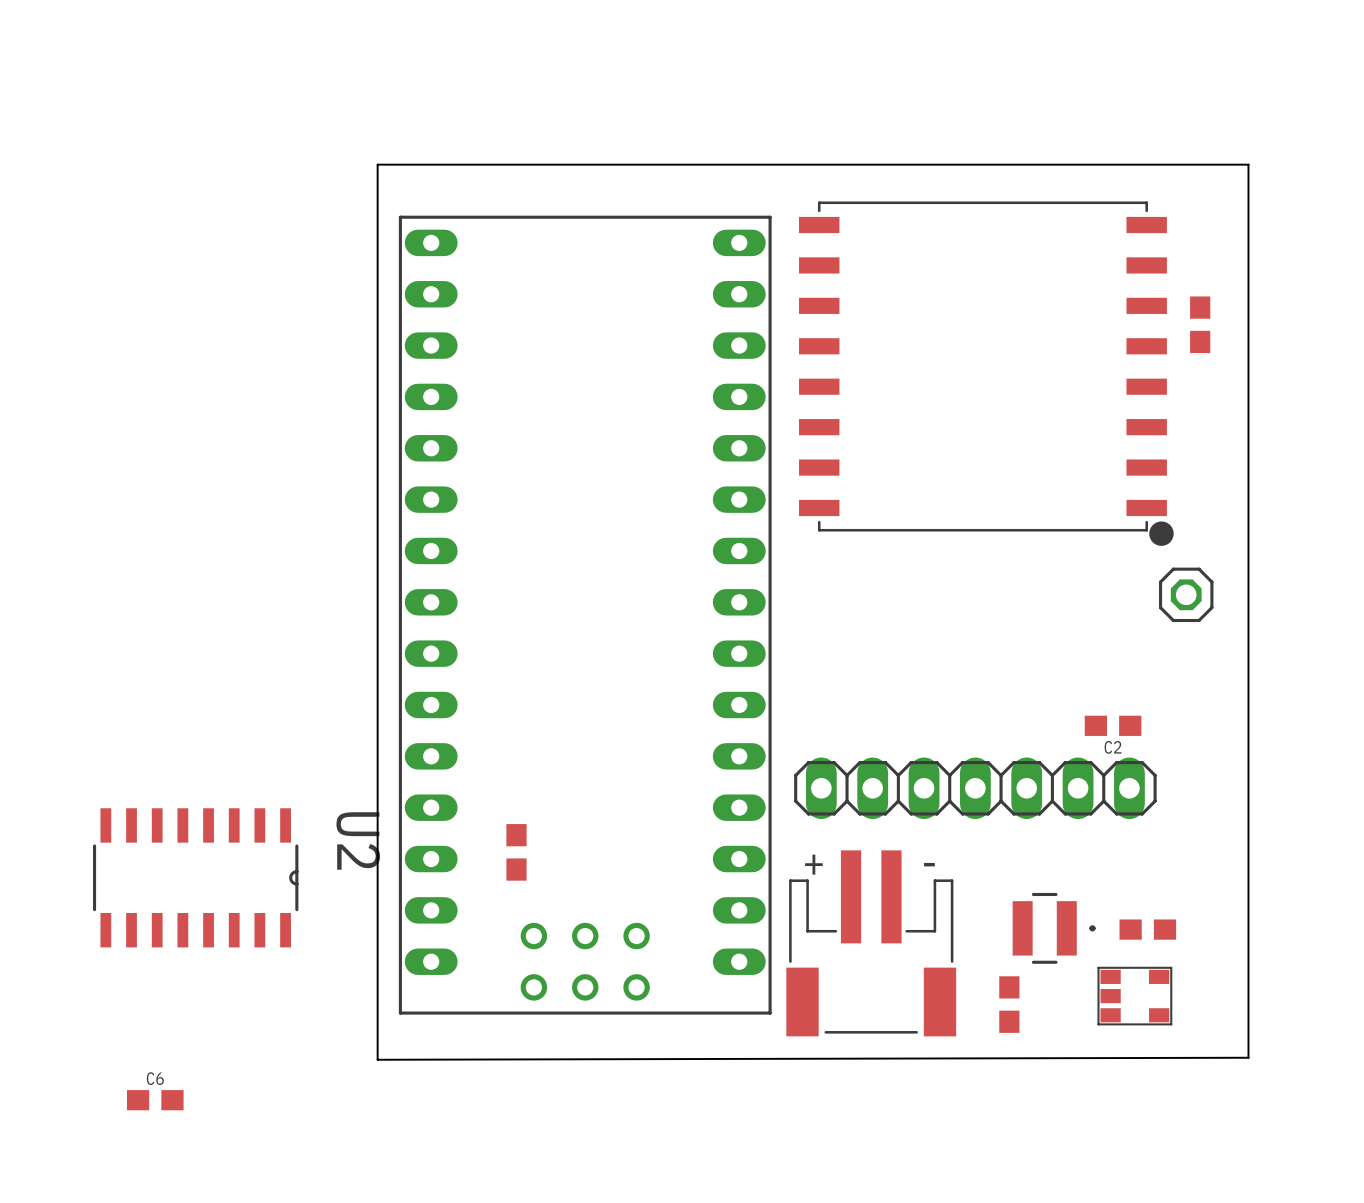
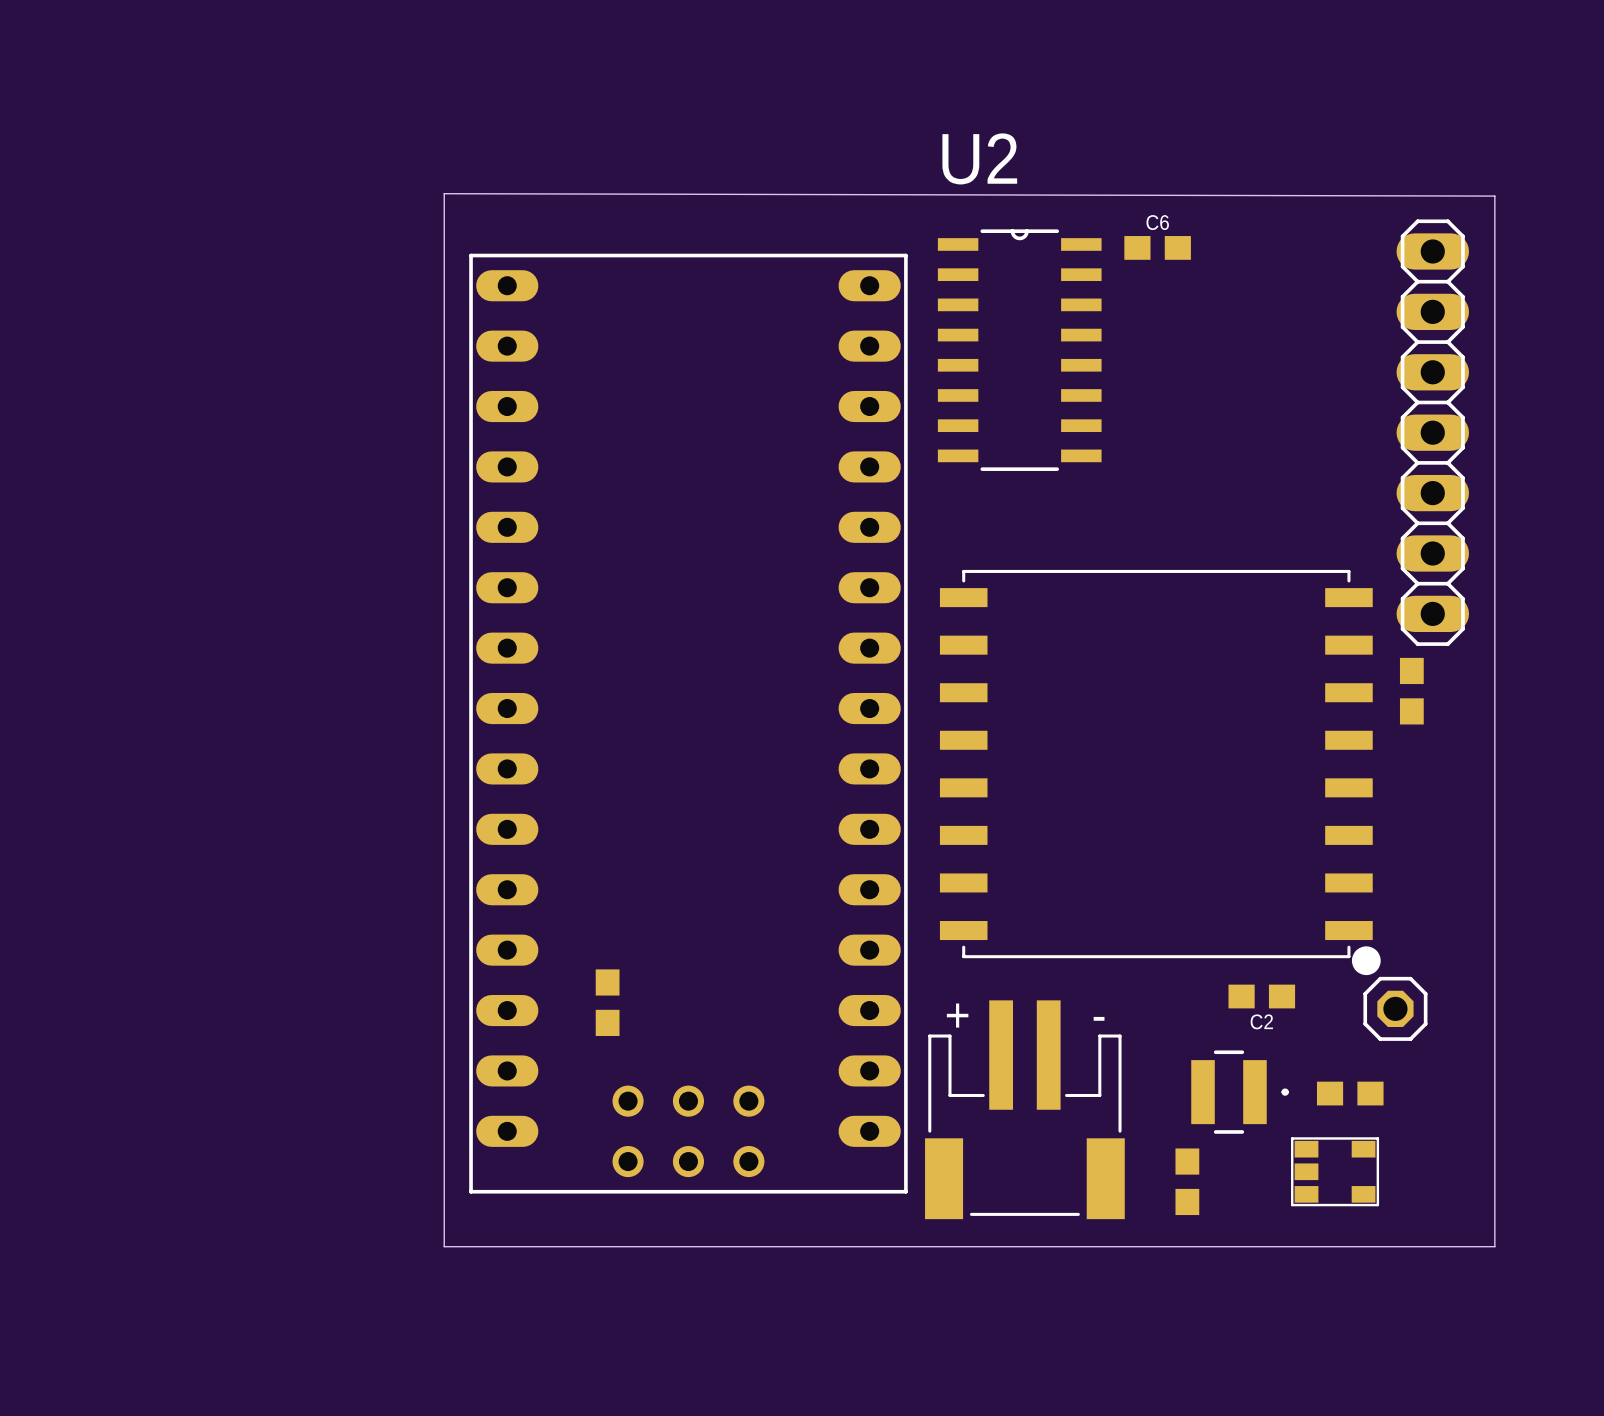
board edge: (377, 164) (1248, 164) (1248, 1057) (377, 1059) -> (444, 193) (1494, 196) (1494, 1246) (444, 1246)
part: (1200, 324) -> none
part position: (986, 373) -> (1160, 772)
part footprint: [1159, 567, 1214, 623] -> [1399, 657, 1424, 725]
C2 position: (1113, 725) -> (1261, 996)
part rotation: 0° (975, 788) -> 90° clockwise (1432, 432)
part position: (975, 788) -> (1432, 432)
part: none -> (1395, 1008)
U2 rotation: 0° (195, 877) -> 90° counterclockwise (1019, 350)
U2 position: (195, 877) -> (1019, 350)
C6 position: (155, 1100) -> (1157, 247)

